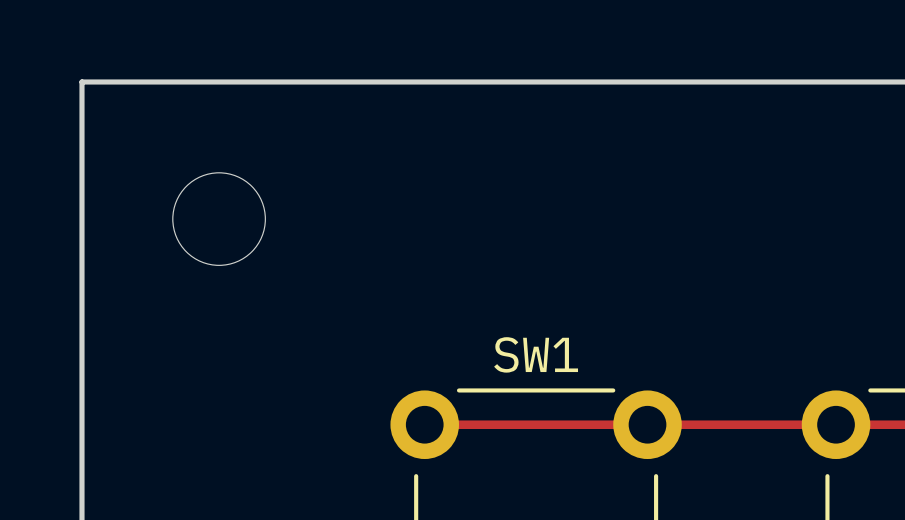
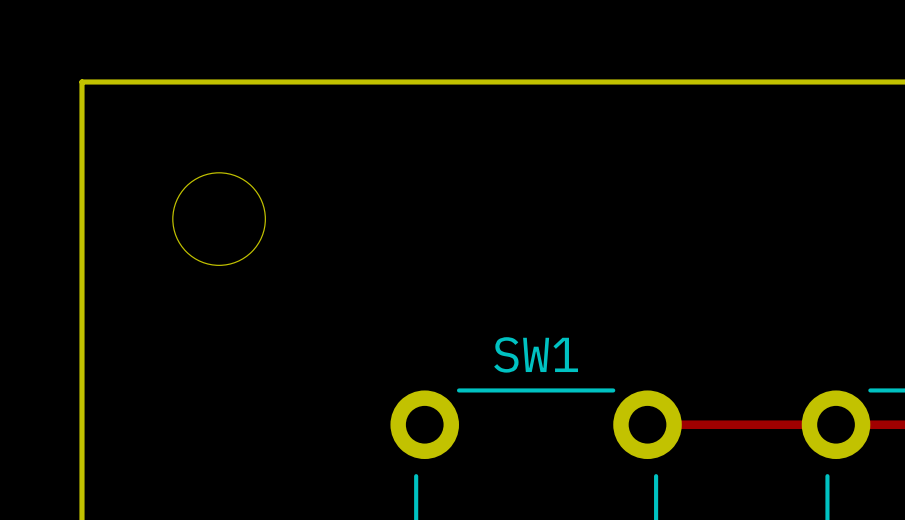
track: (424, 424) (647, 424) -> none

